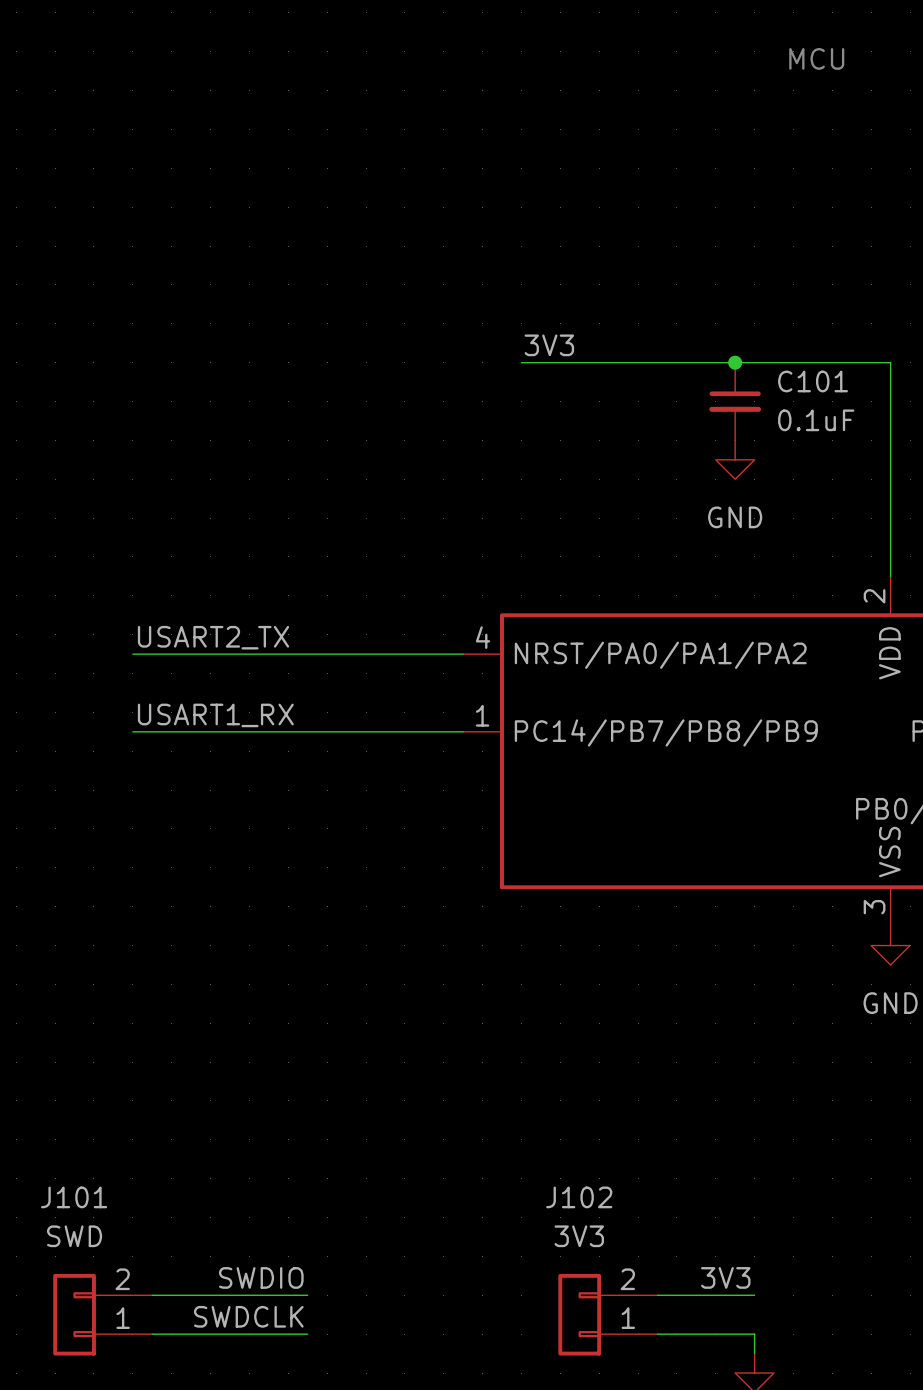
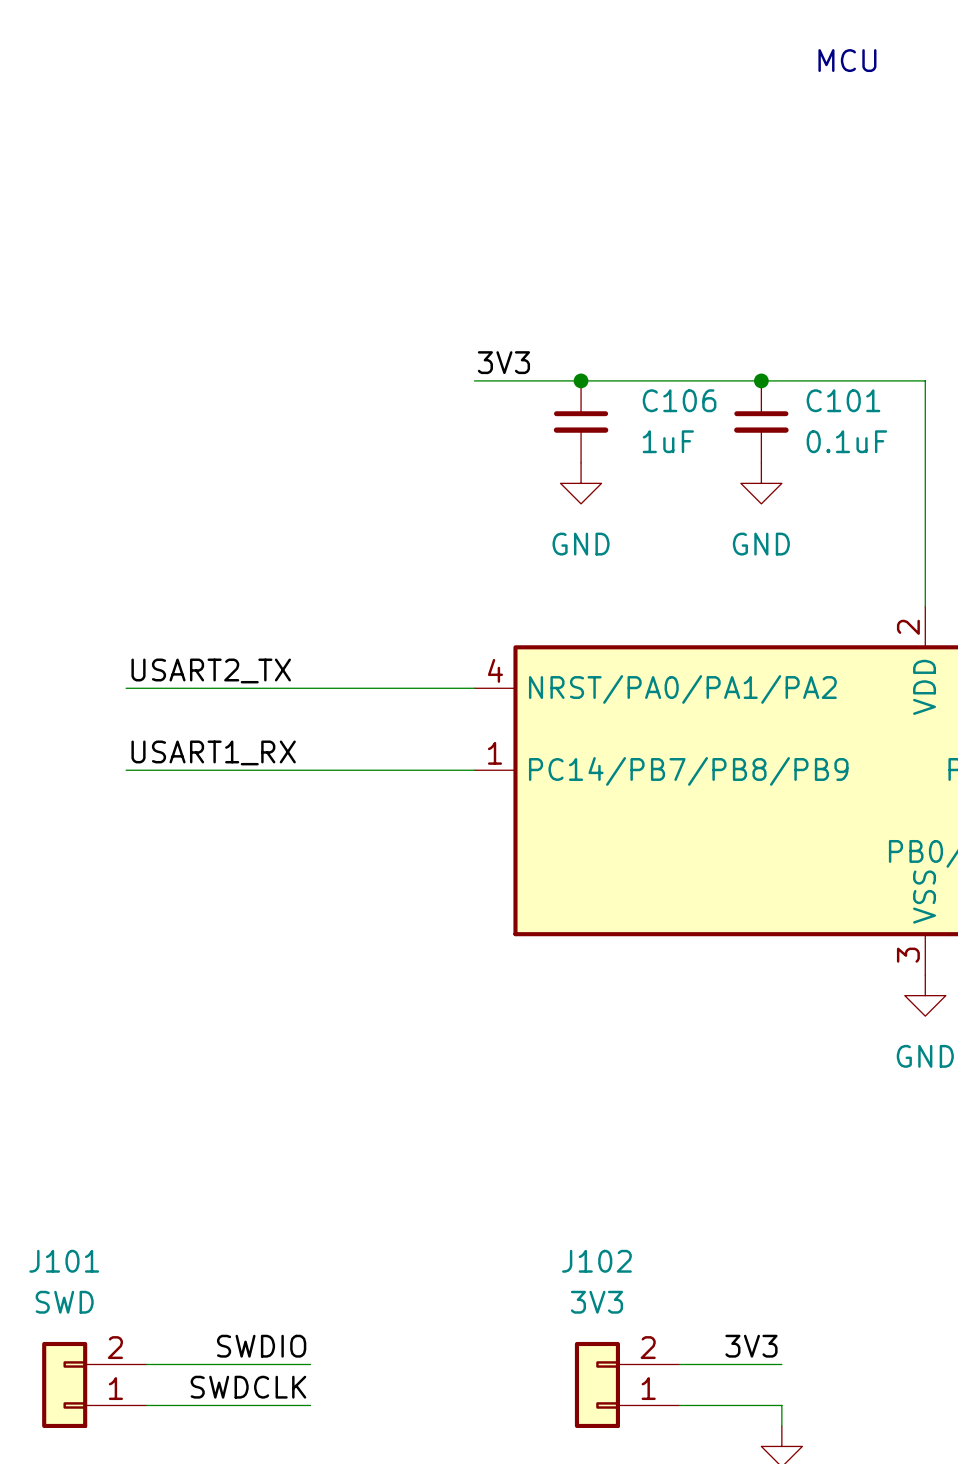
label position: 3V3 (549, 345) -> 3V3 (503, 362)
wire: none -> (474, 380) (535, 380)
junction: none -> (581, 380)
C106: none -> 1uF (581, 421)
power symbol: none -> GND (581, 483)

